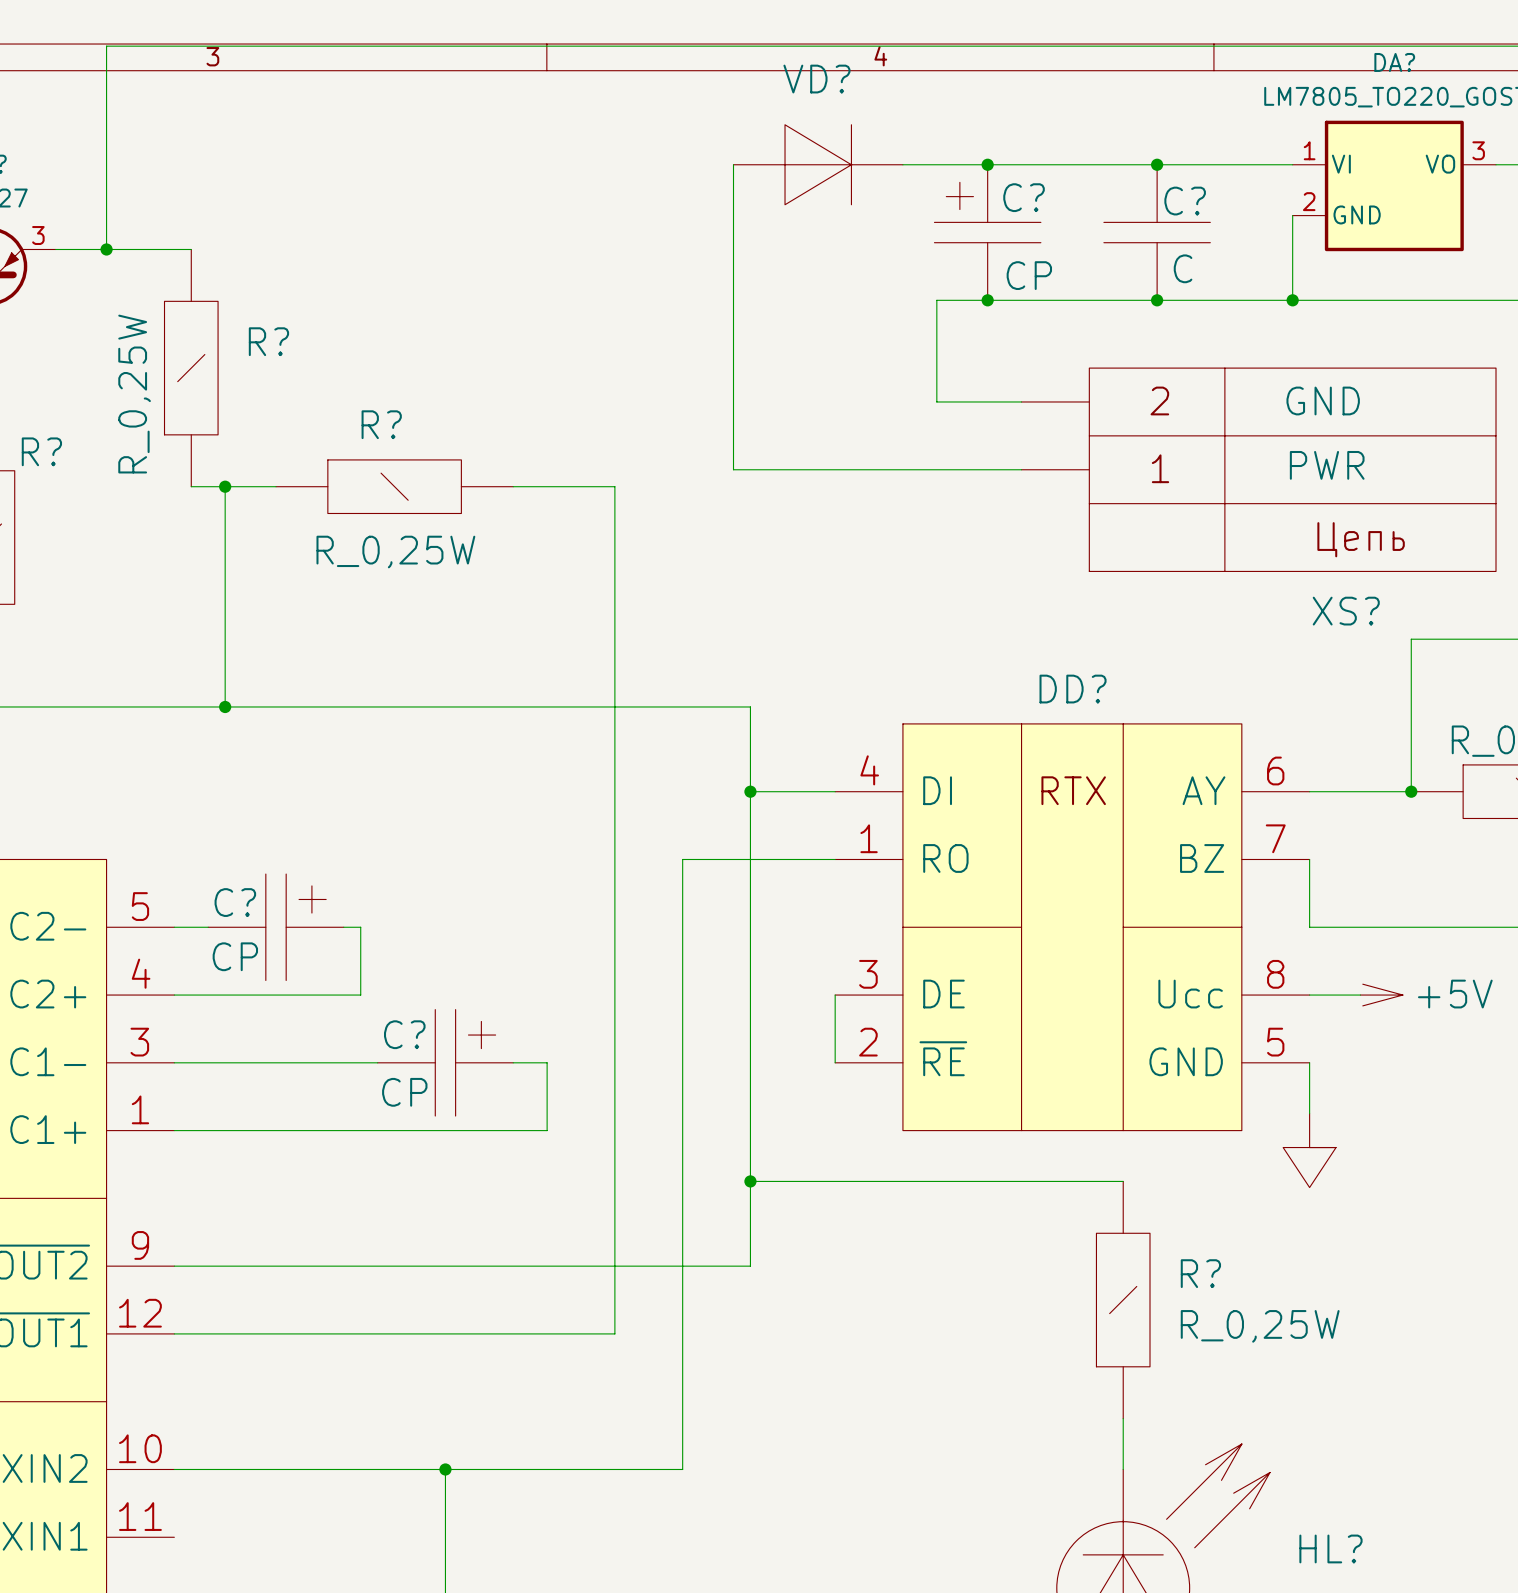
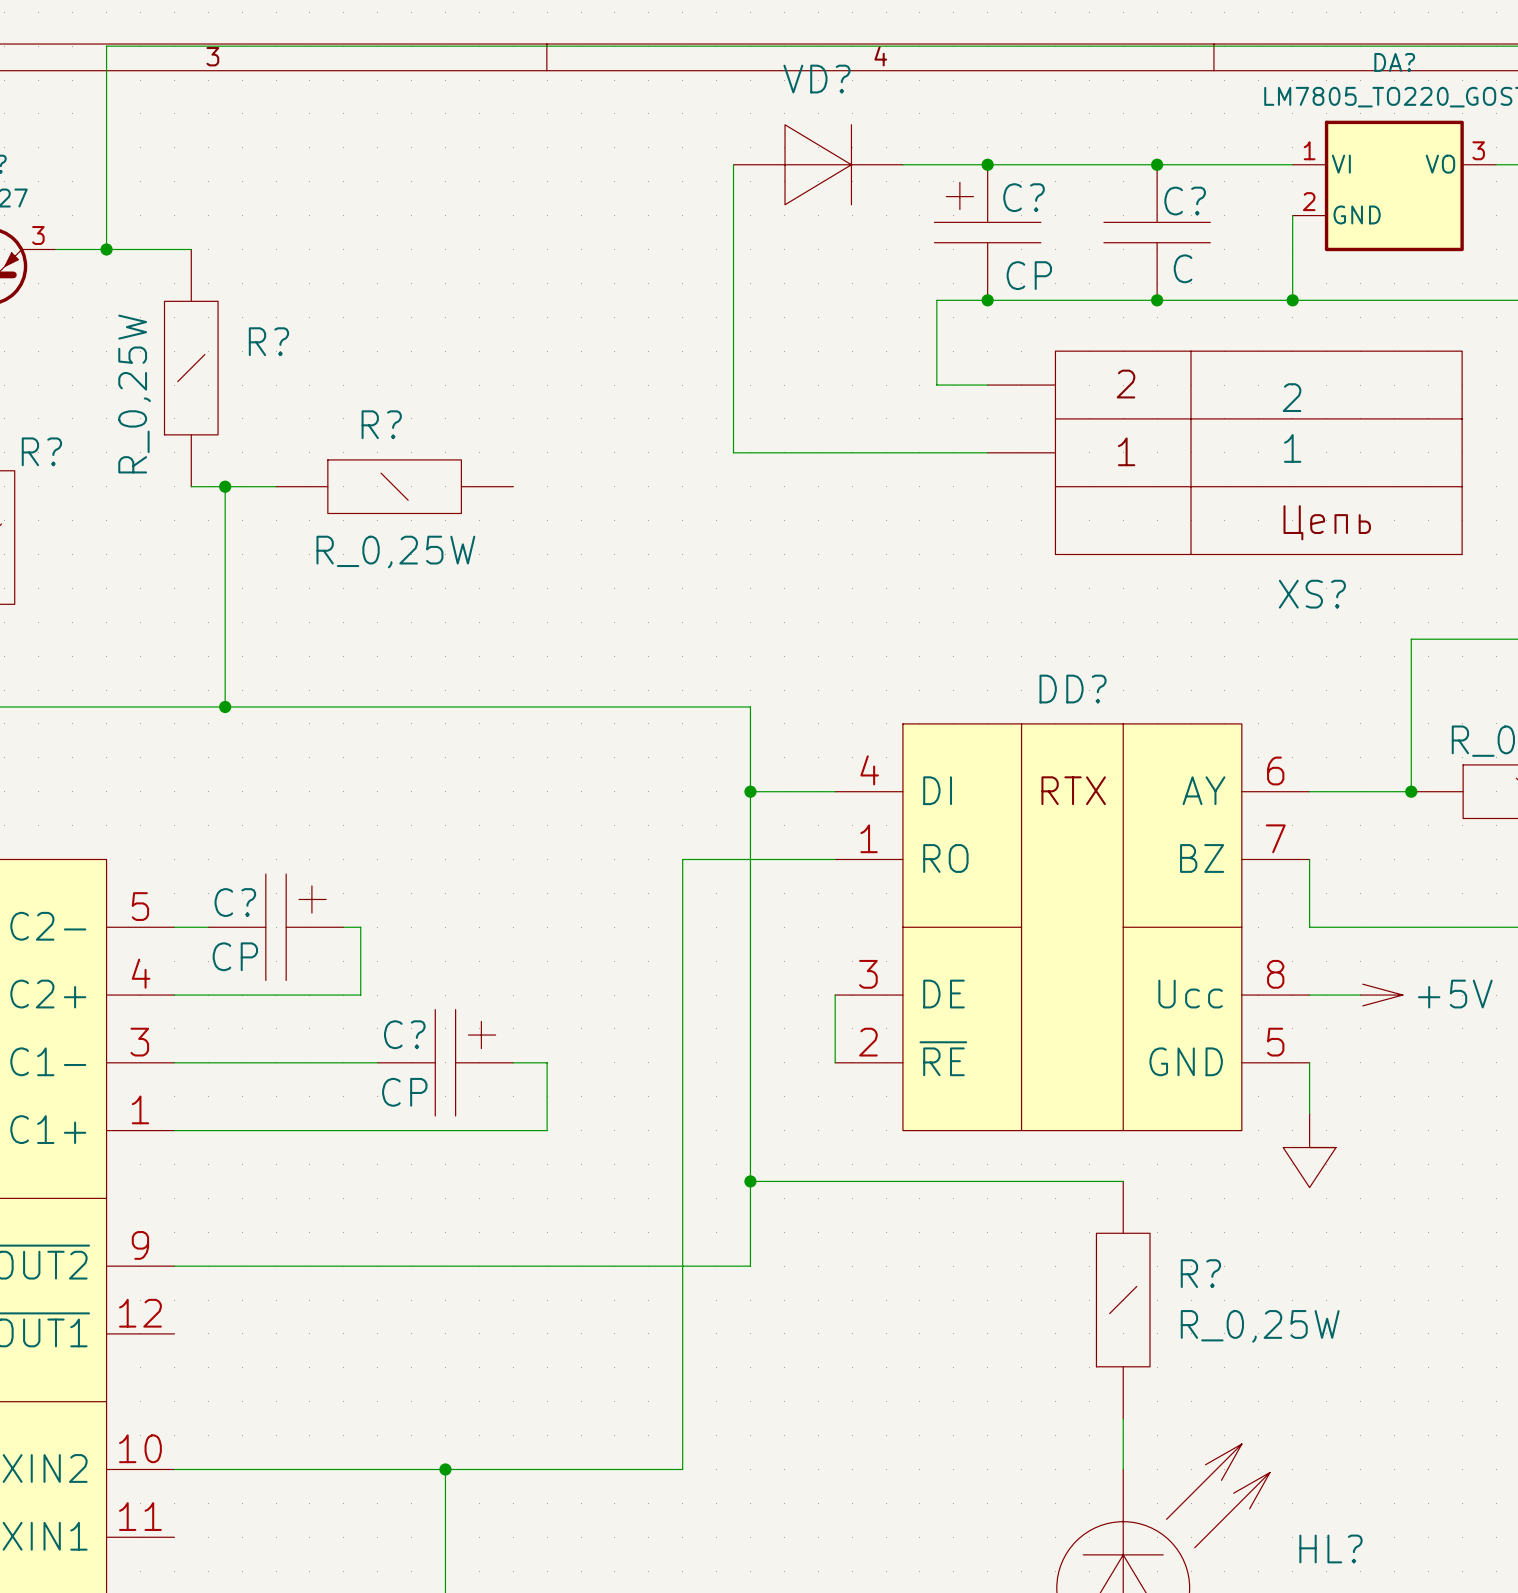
wire: (936, 385) (936, 401) (1021, 401) -> (936, 385) (987, 385)
wire: (733, 452) (733, 469) (1021, 469) -> (733, 452) (987, 452)
XS?: none -> (1224, 452)
XS?: (1258, 469) -> none
wire: (513, 486) (614, 486) (614, 1333) (174, 1333) -> none

